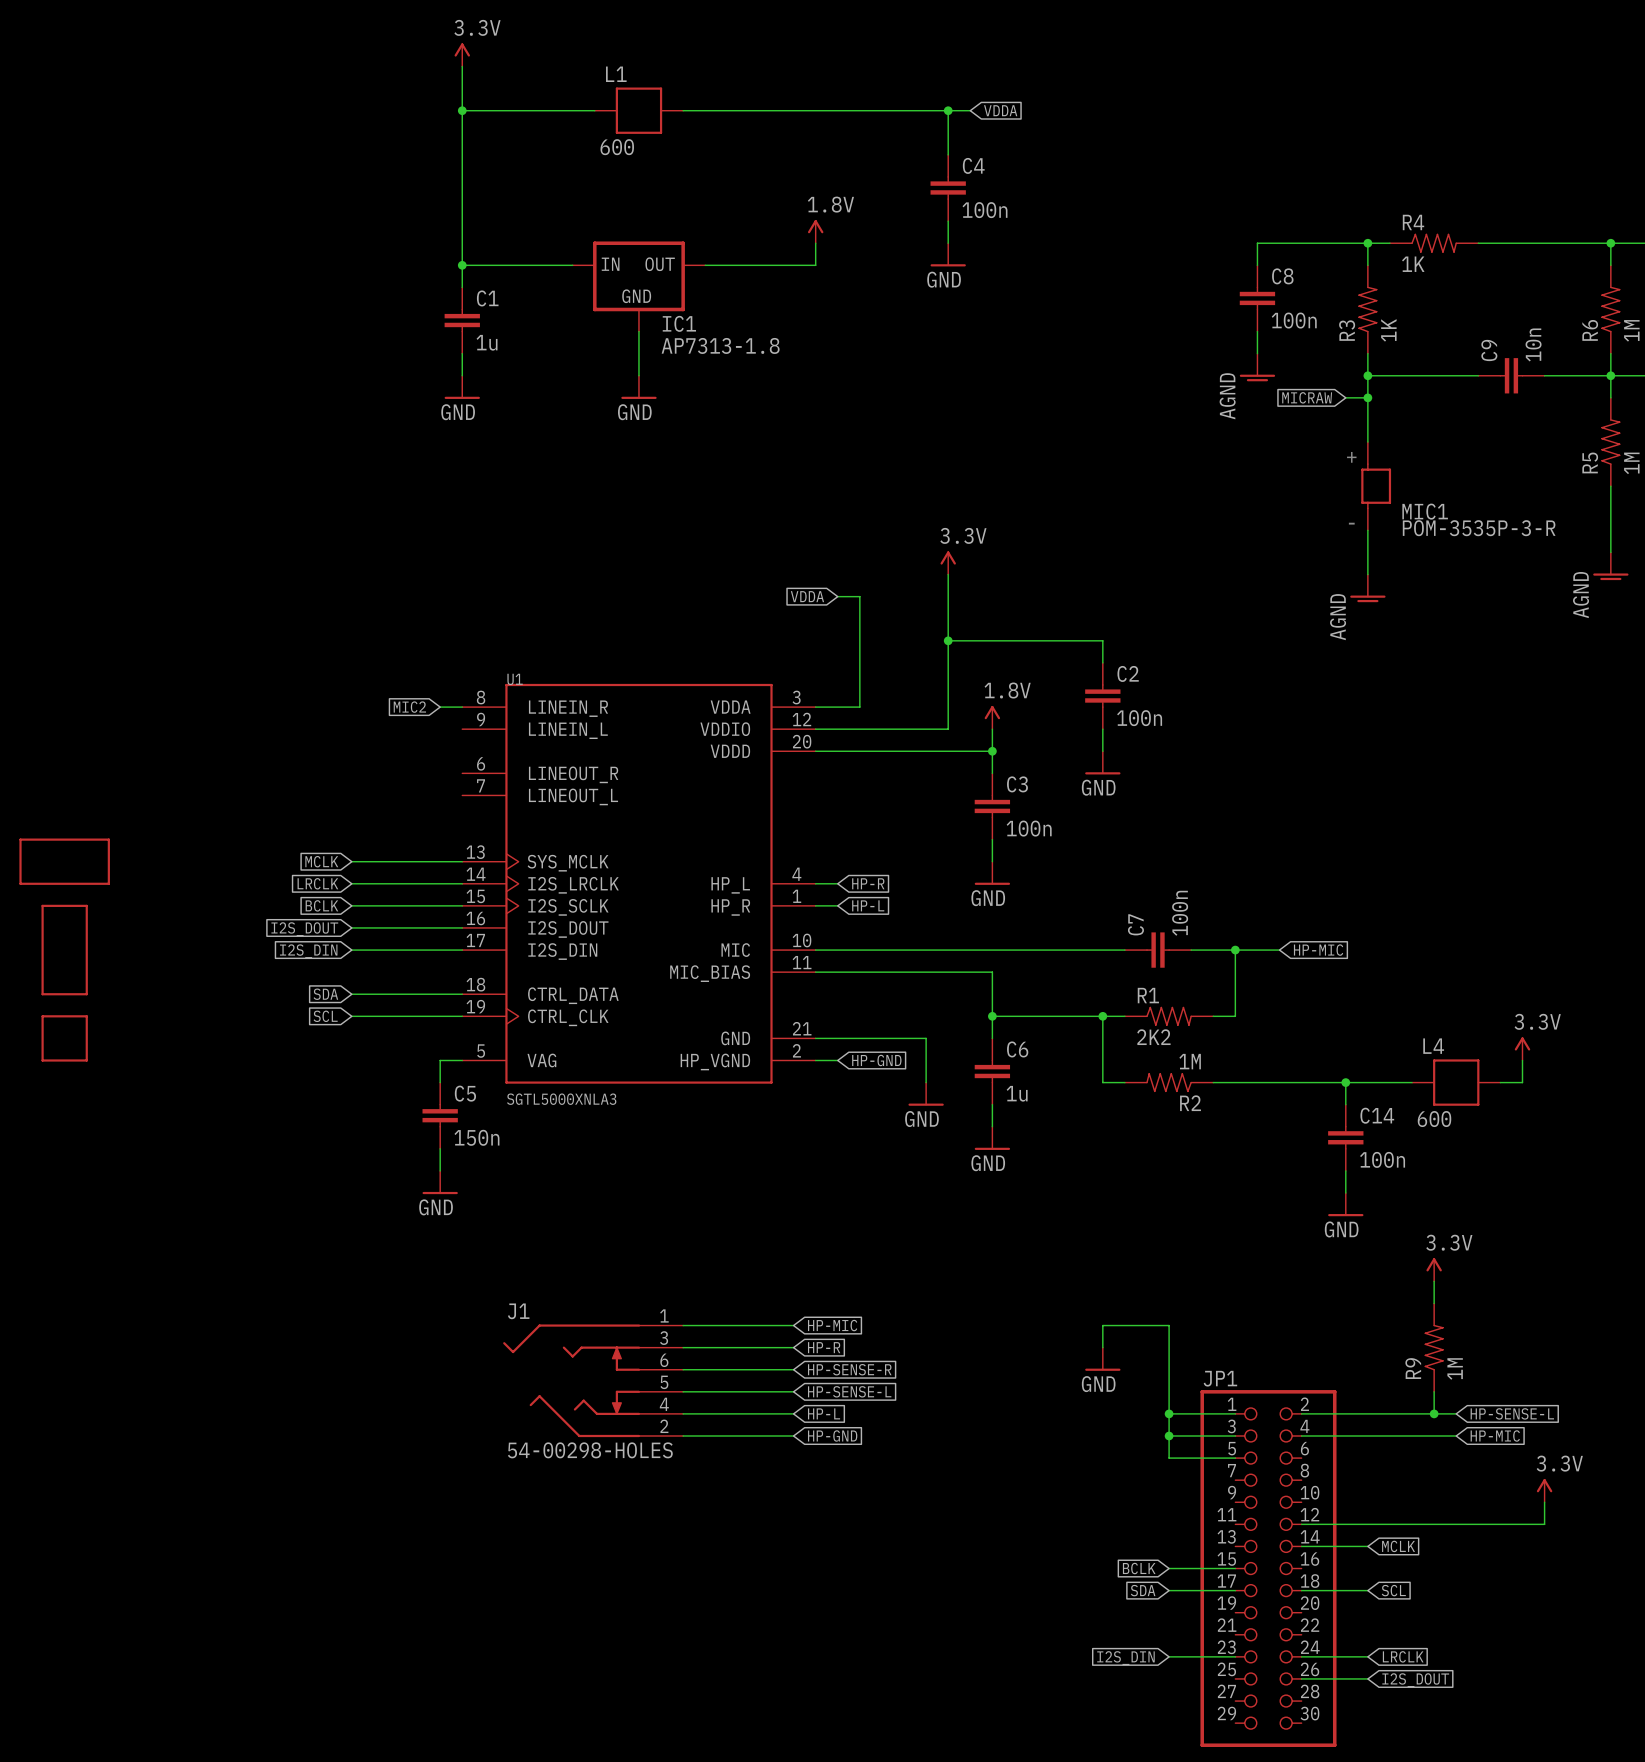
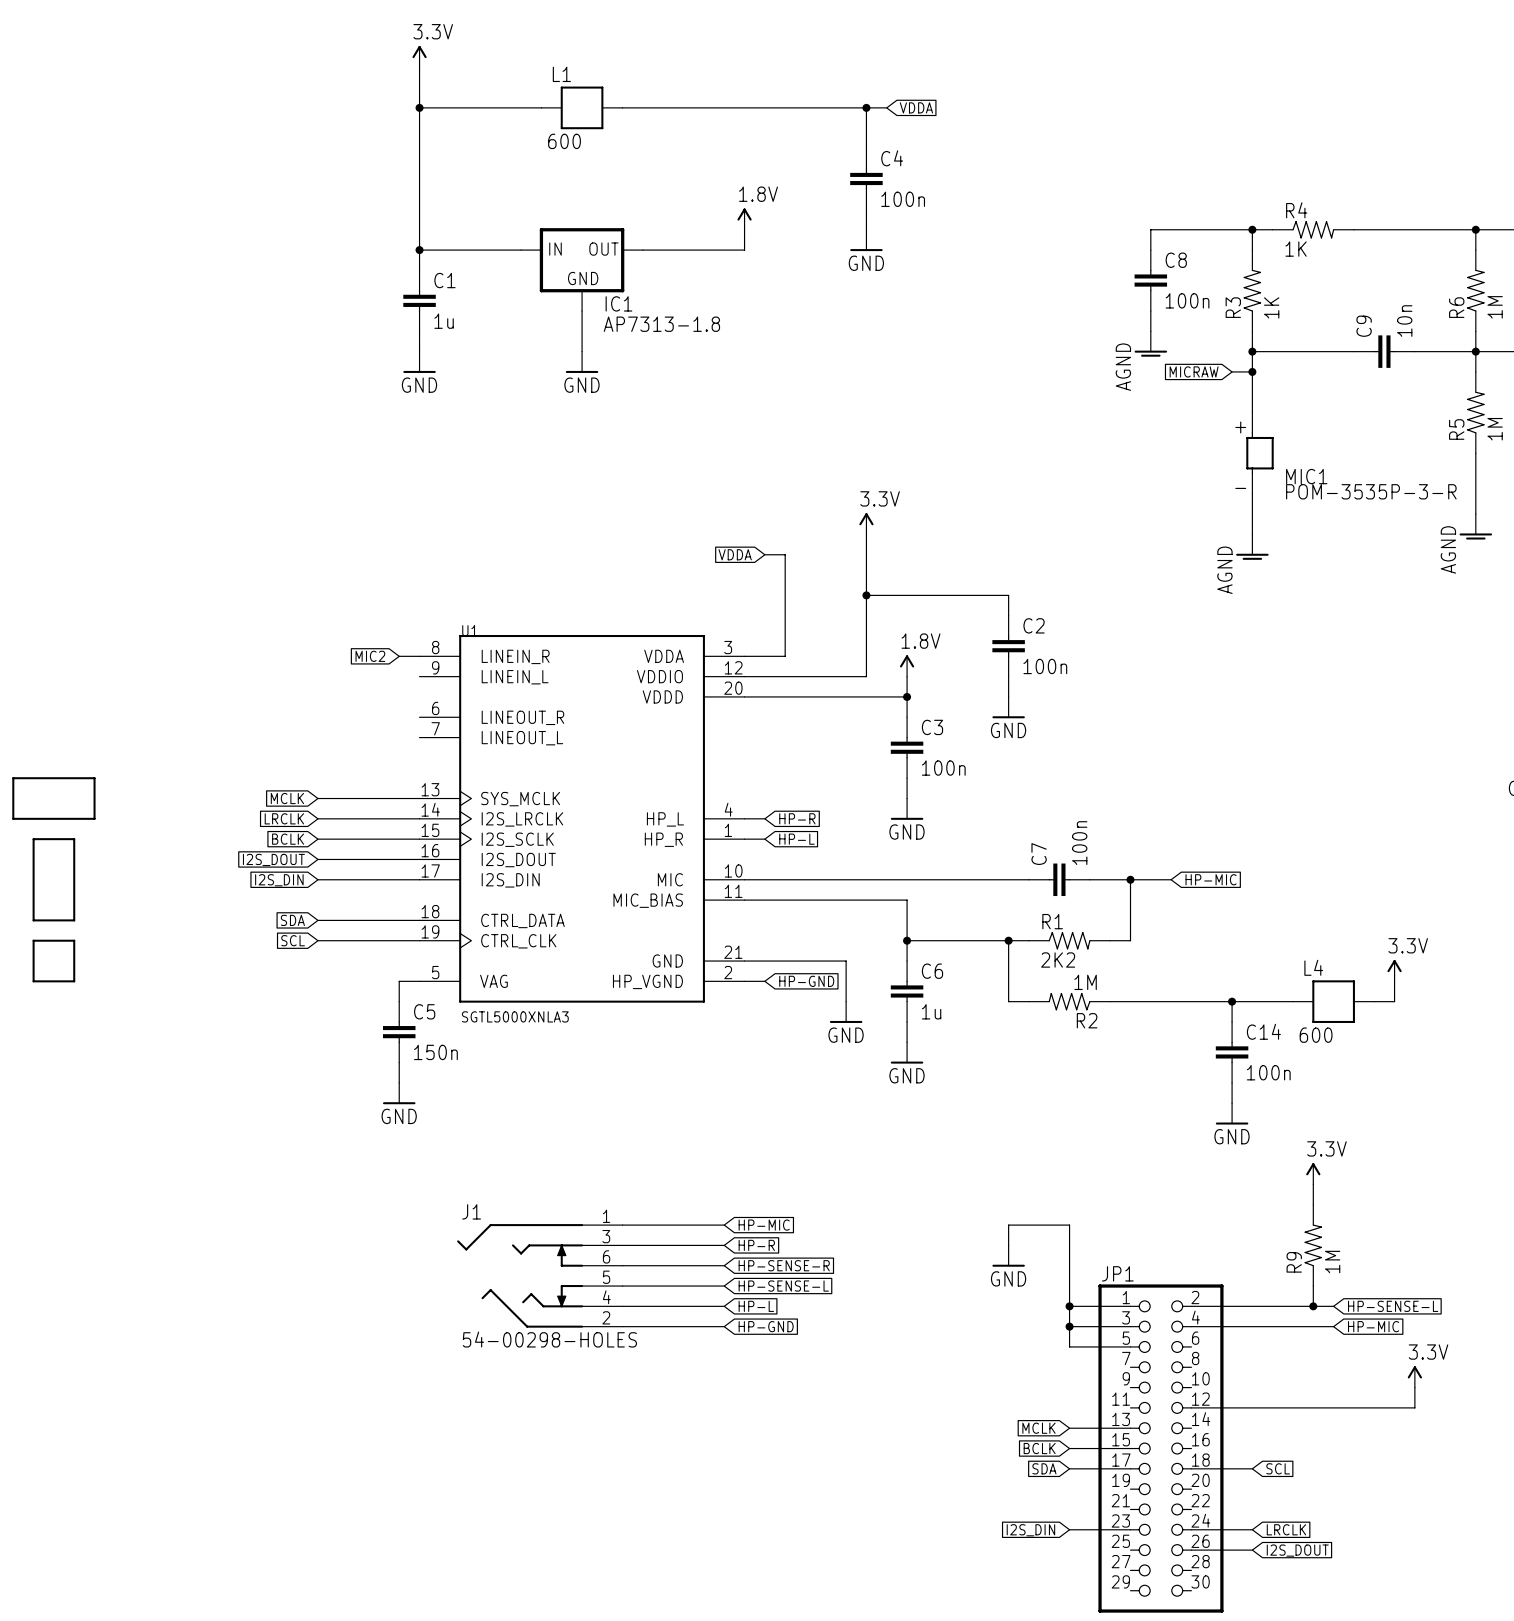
wire: (1301, 1546) (1367, 1546) -> (1069, 1428) (1130, 1428)
global label rotation: 0° (1398, 1546) -> 180° (1038, 1428)
global label position: MCLK (1398, 1546) -> MCLK (1038, 1428)

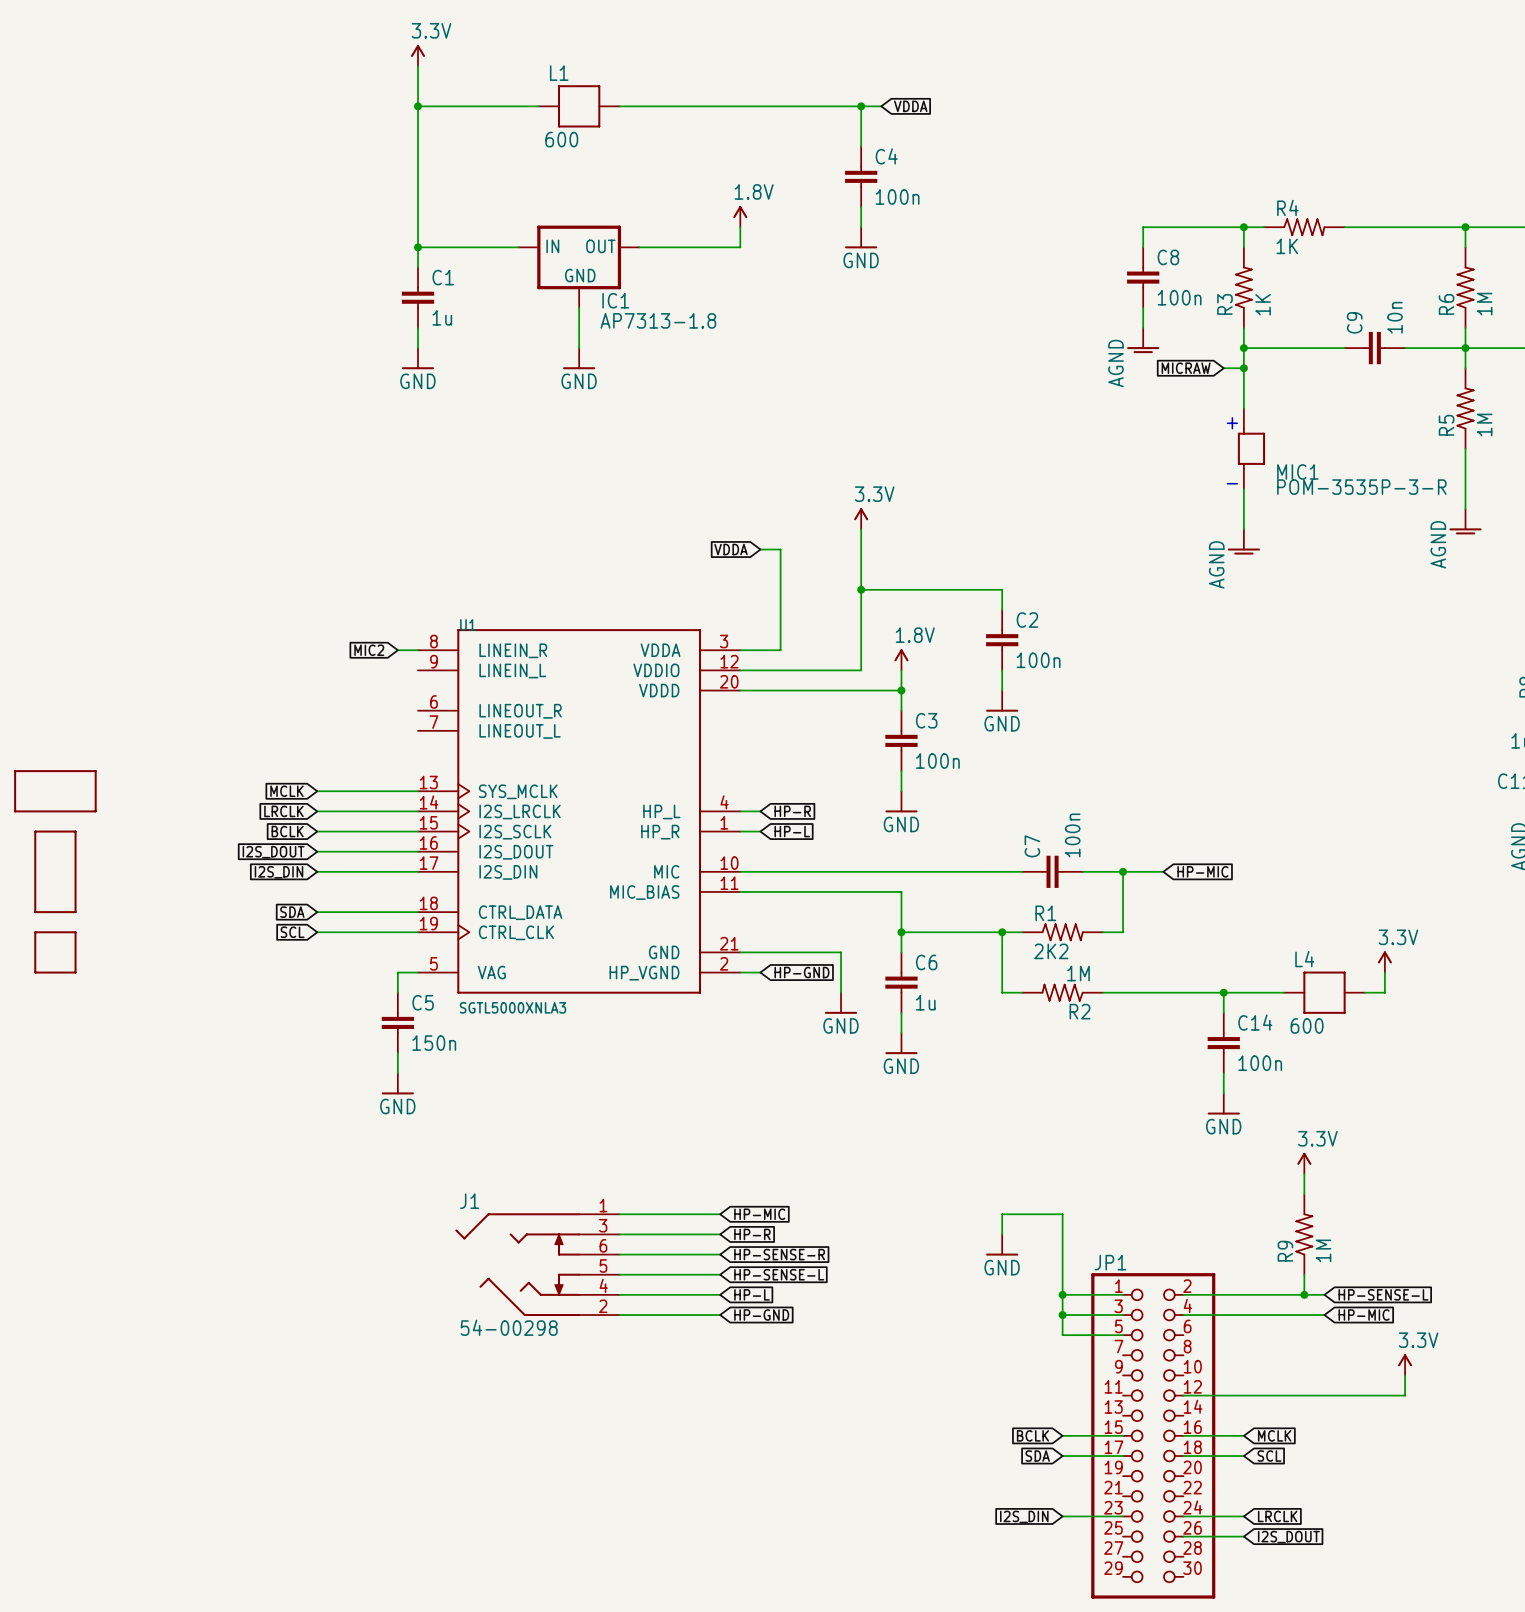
J1 value: 54-00298-HOLES (549, 1339) -> 54-00298 (509, 1327)
global label rotation: 0° (1038, 1428) -> 180° (1274, 1435)
global label position: MCLK (1038, 1428) -> MCLK (1274, 1435)
wire: (1069, 1428) (1130, 1428) -> (1183, 1435) (1243, 1435)

